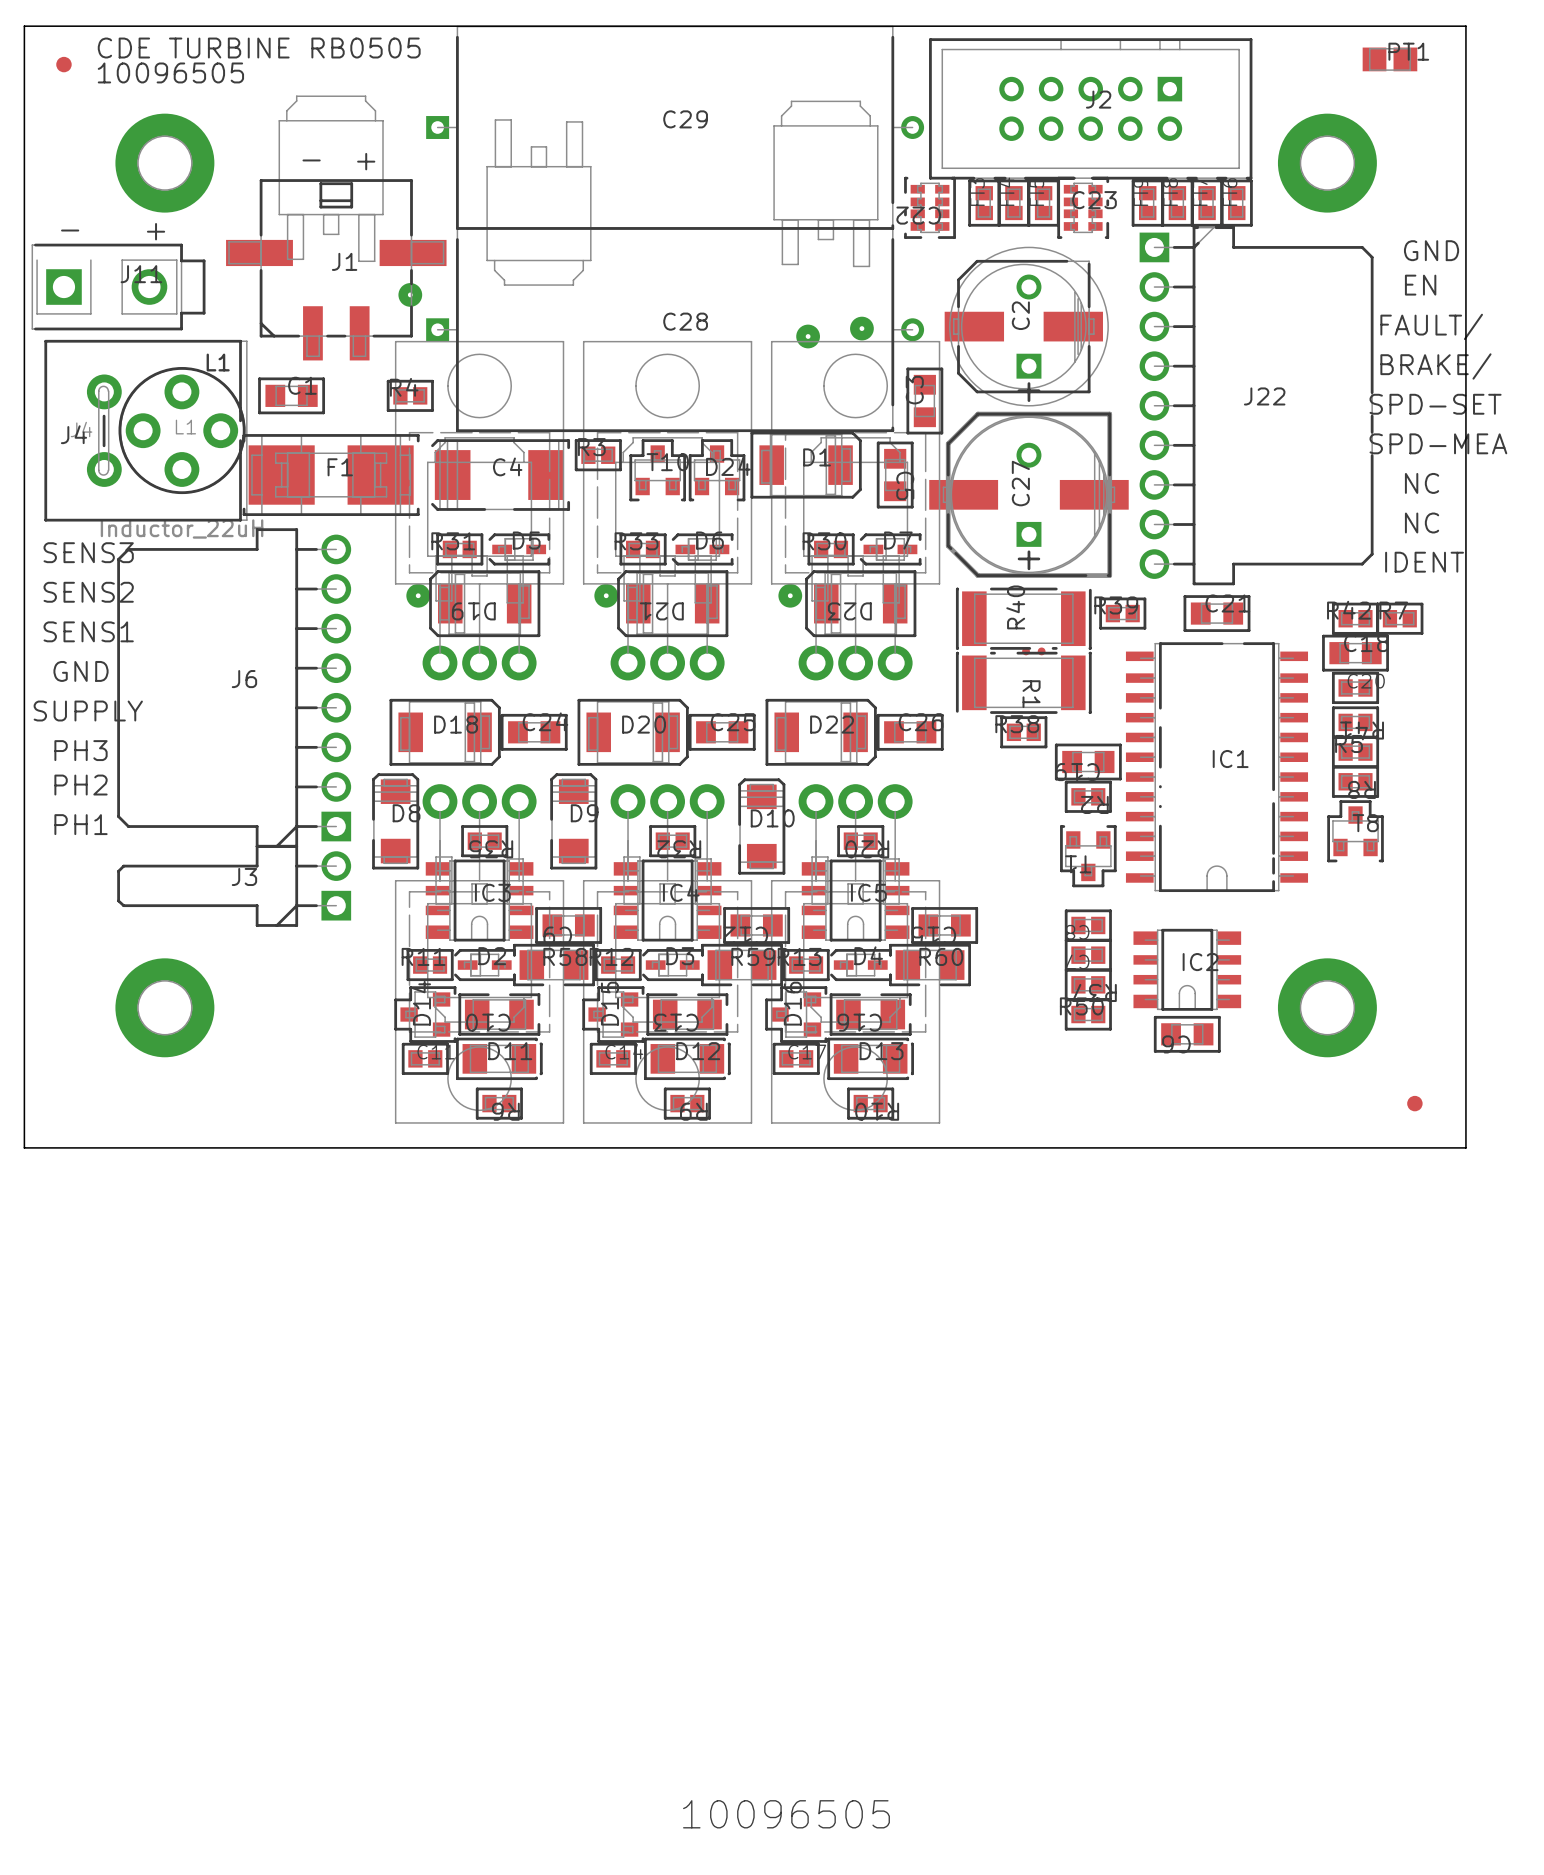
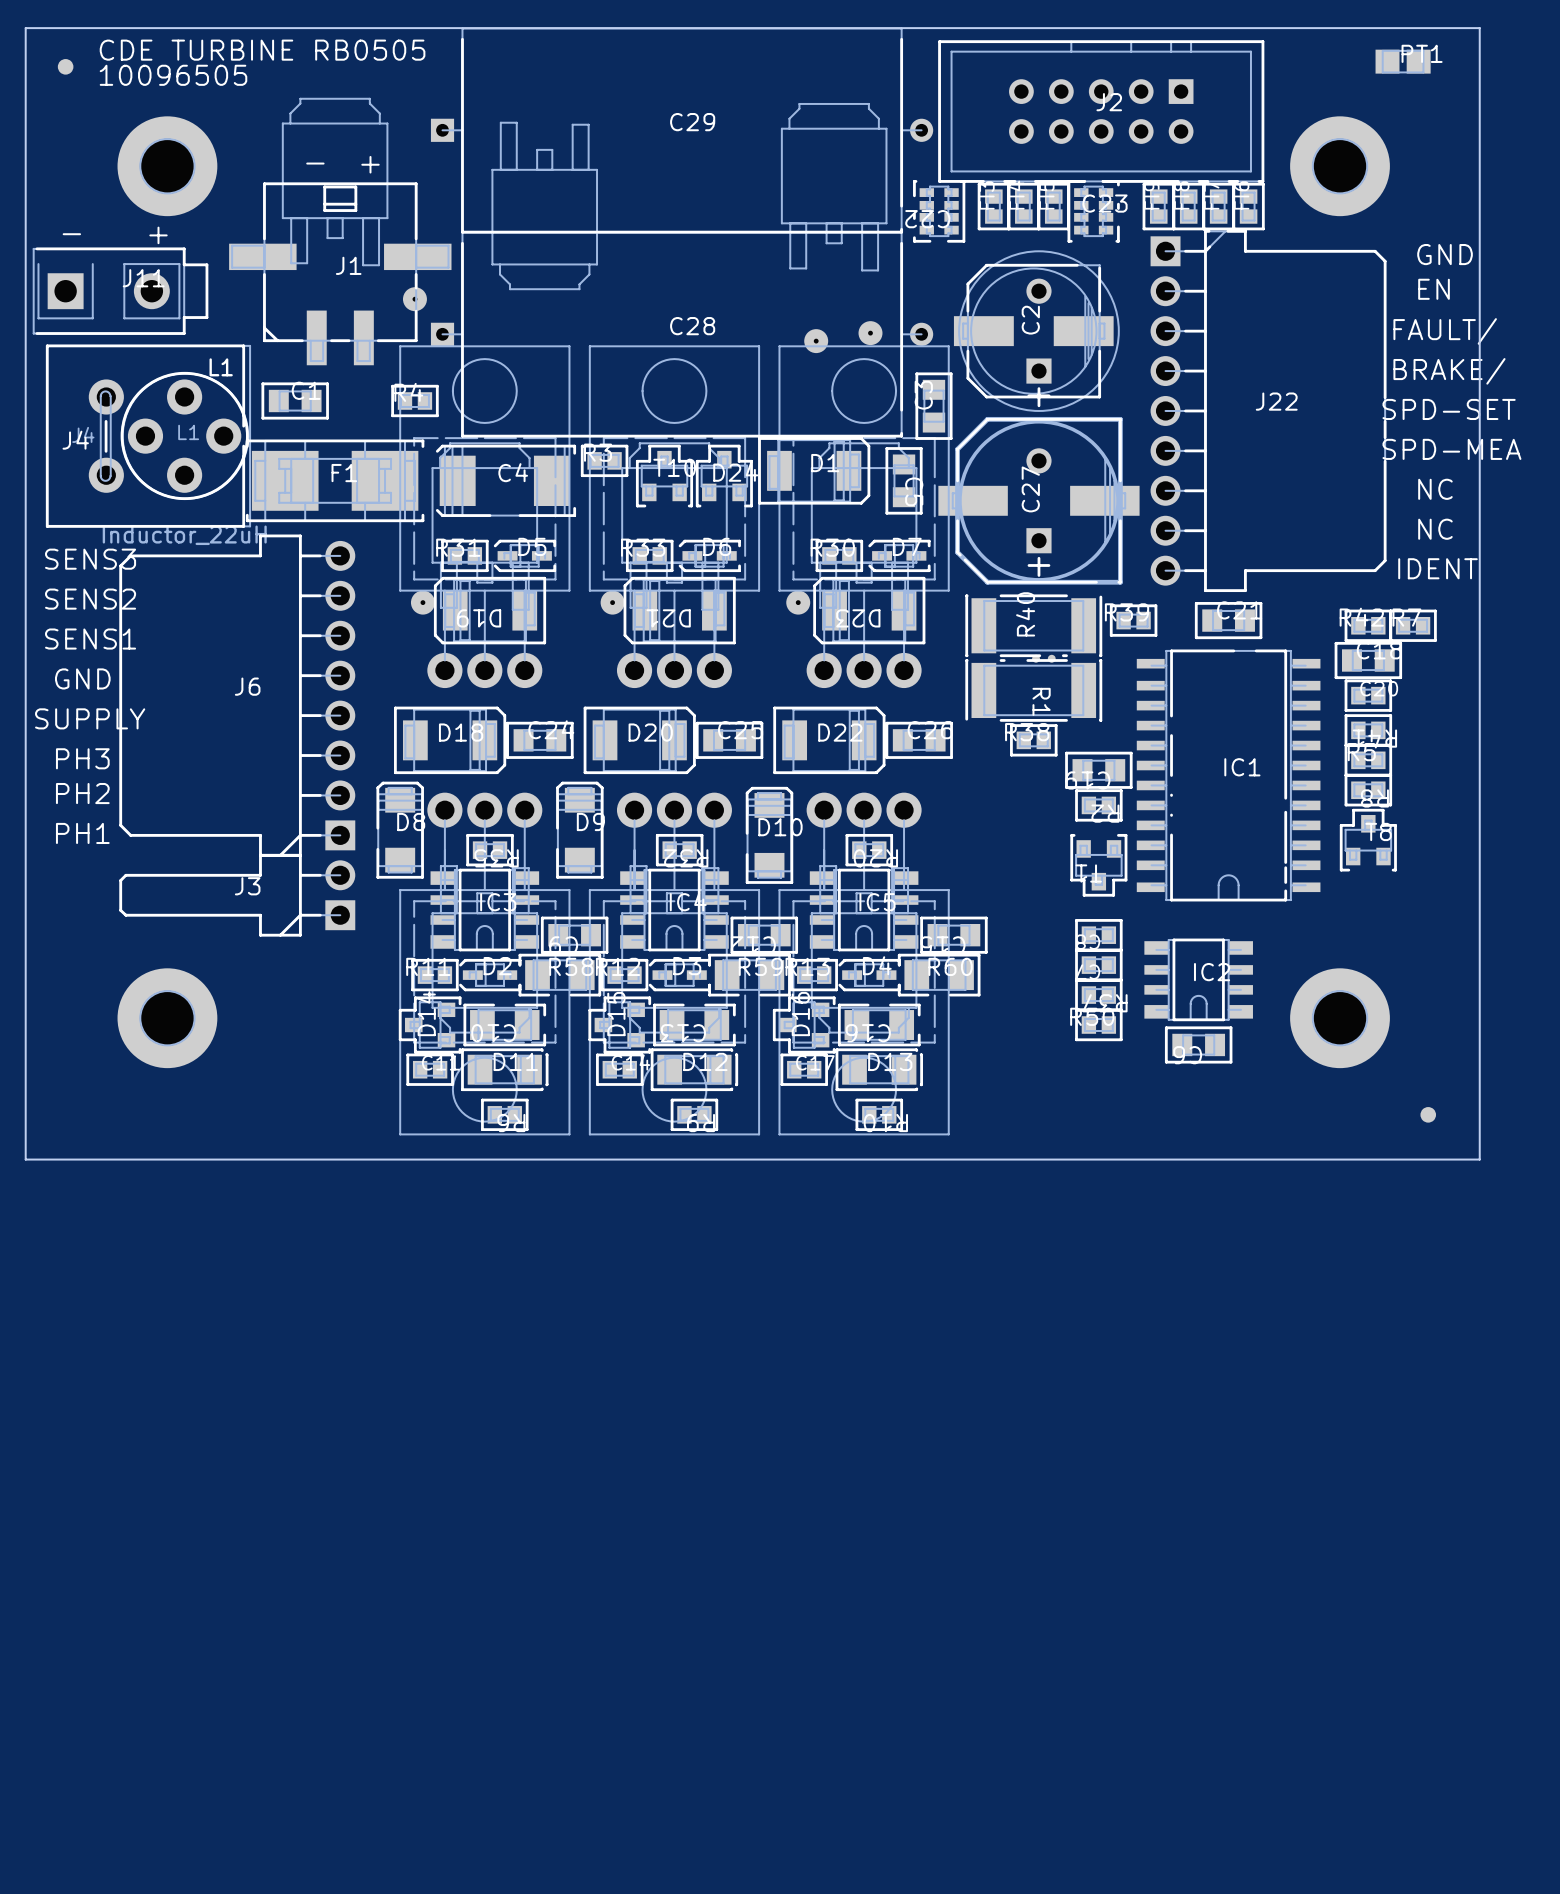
text: 10096505 (786, 1814) -> none

